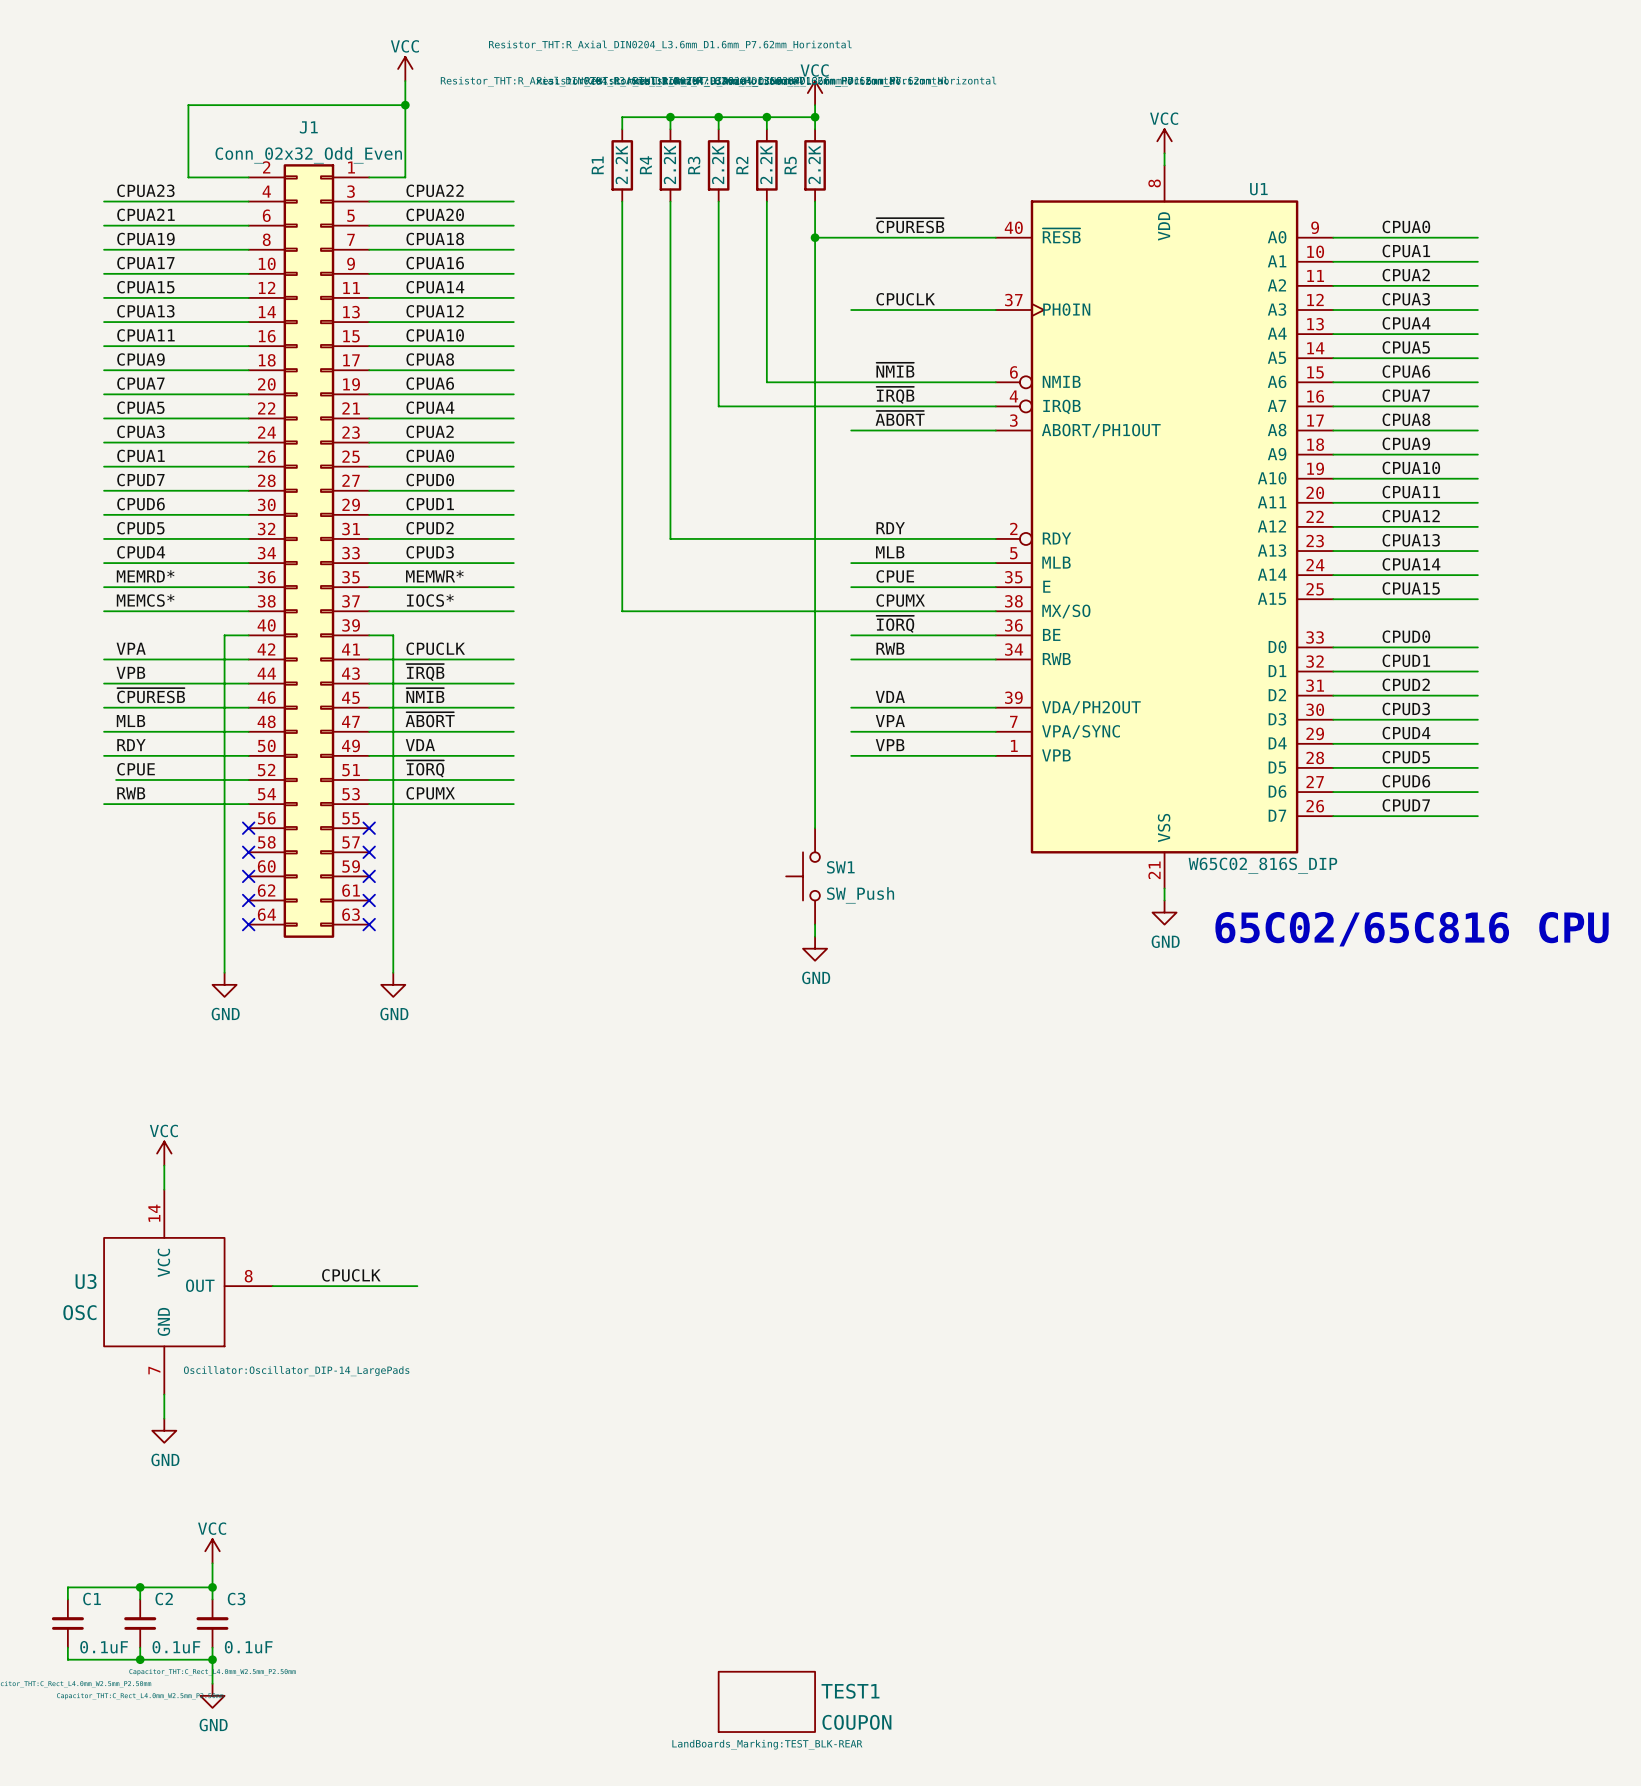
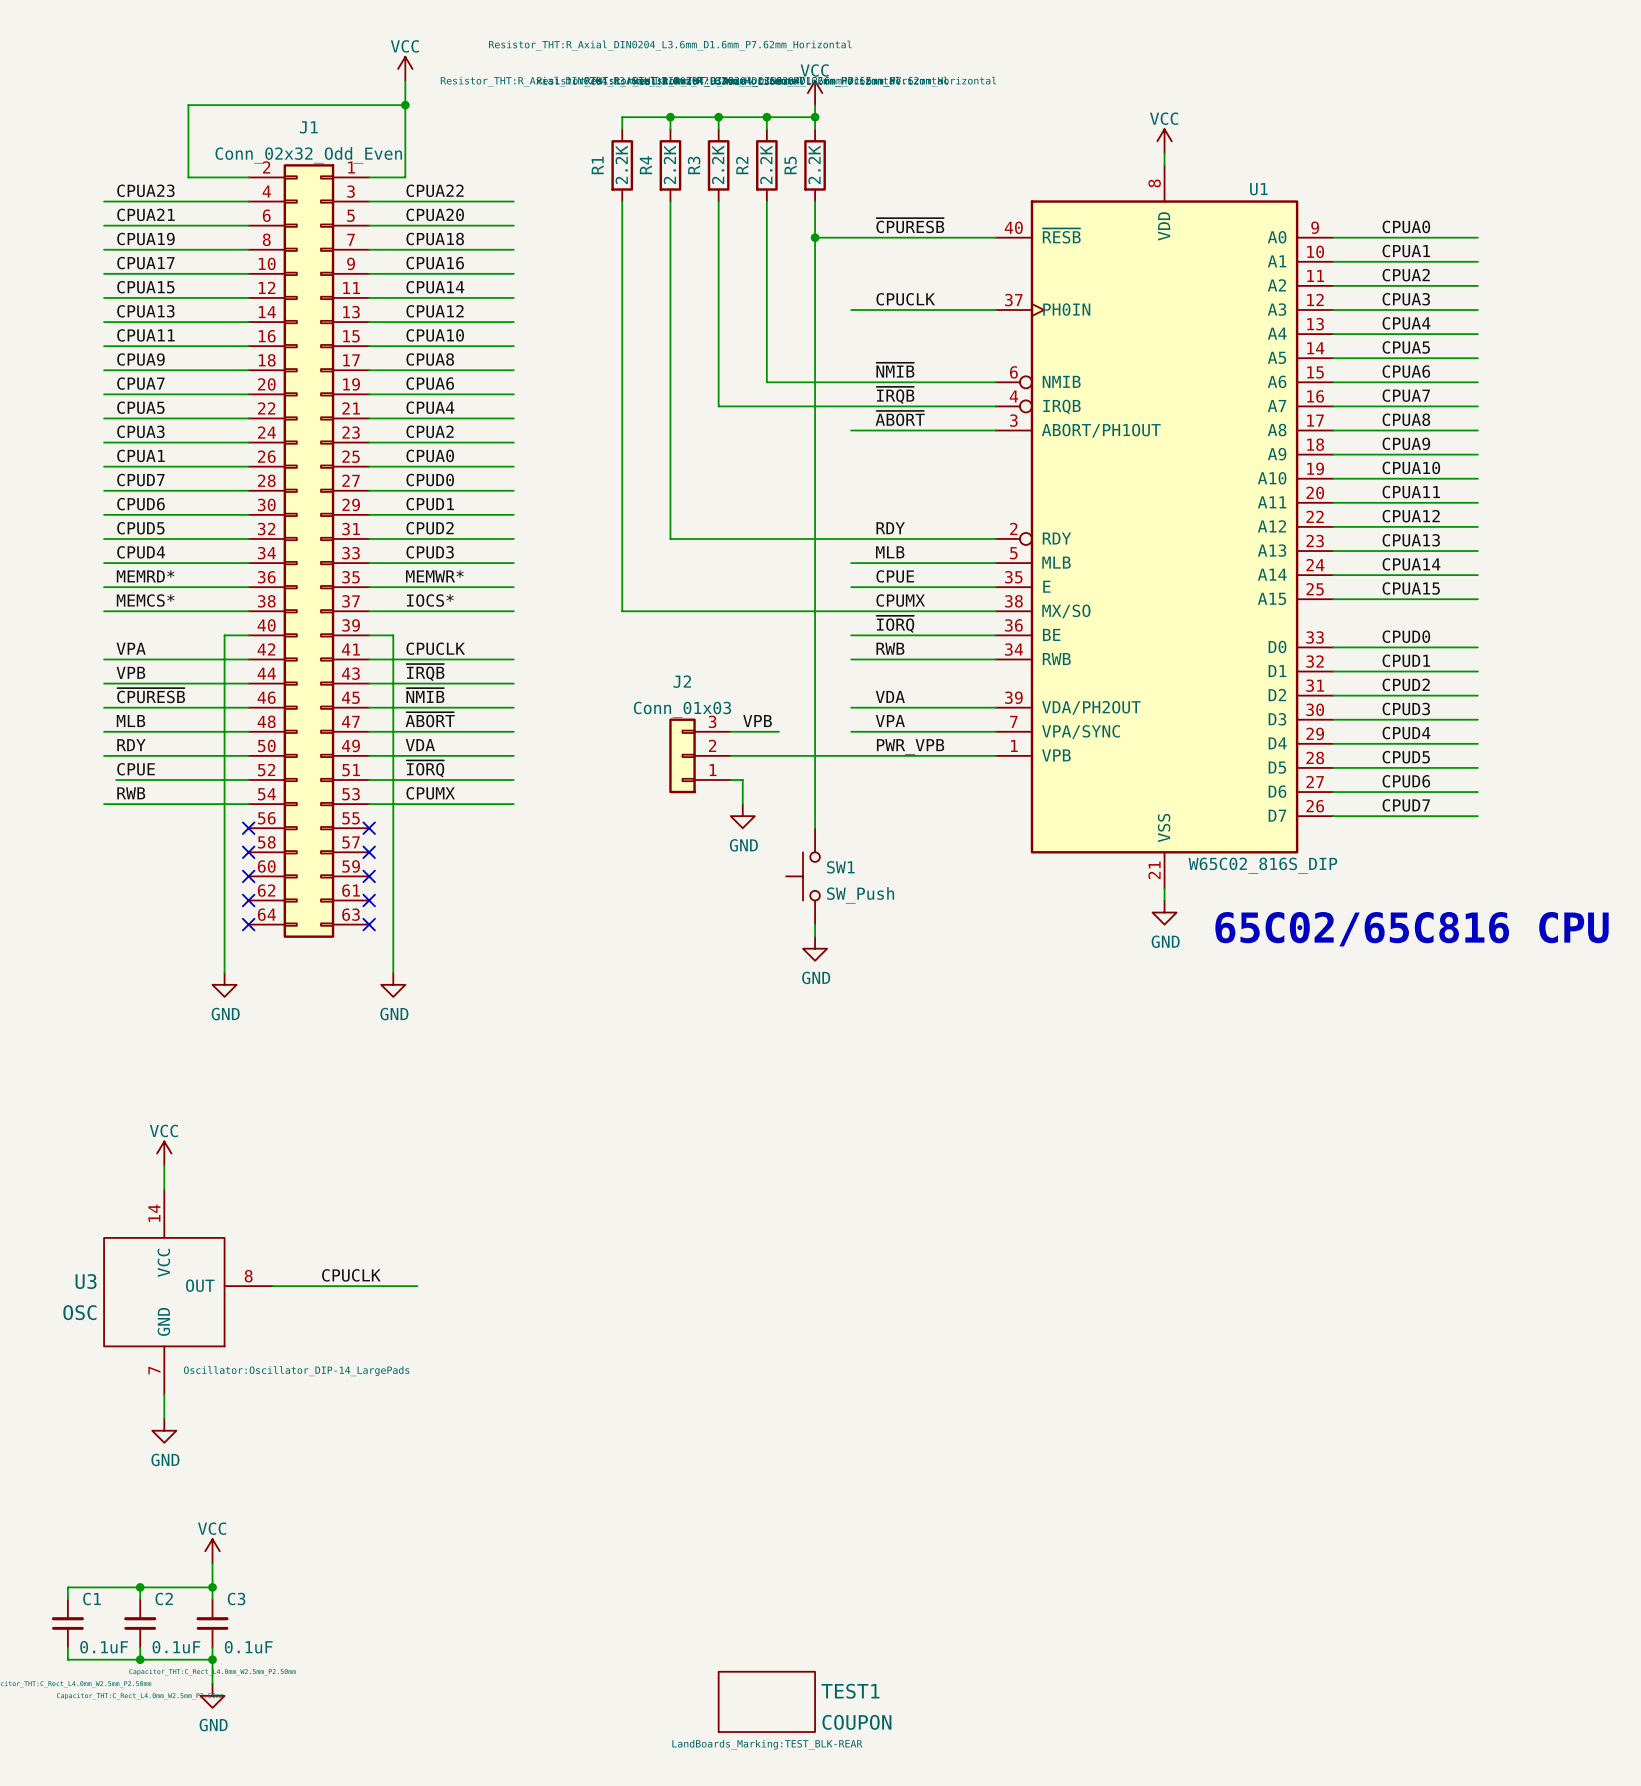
label: none -> VPB (757, 721)
wire: none -> (730, 731) (778, 731)
label: VPB (890, 745) -> PWR_VPB (910, 747)
J2: none -> Conn_01x03 (699, 755)
wire: none -> (730, 755) (851, 755)
wire: none -> (730, 779) (742, 779) (742, 804)
power symbol: none -> GND (742, 816)

